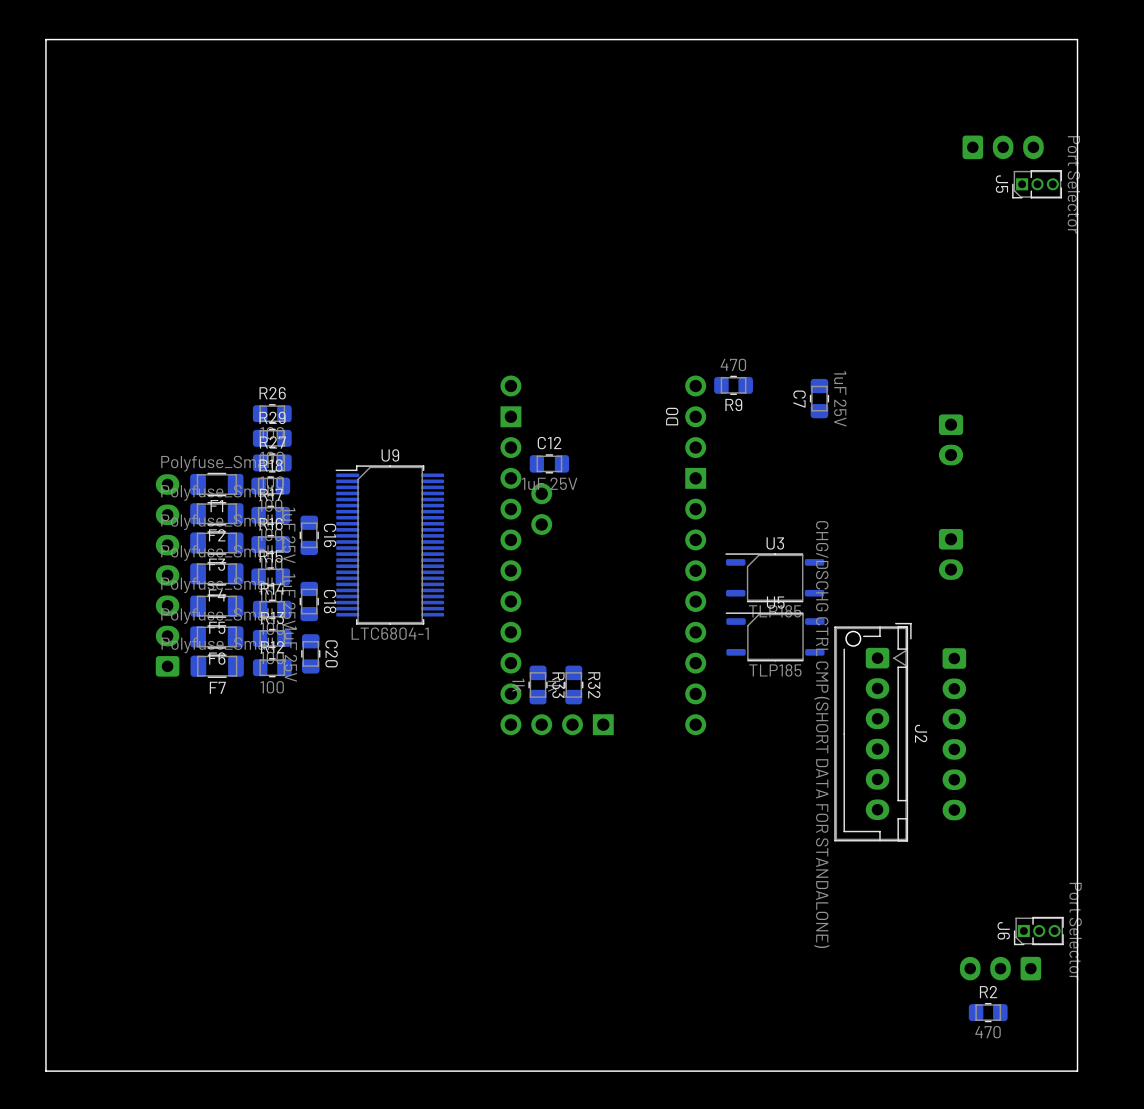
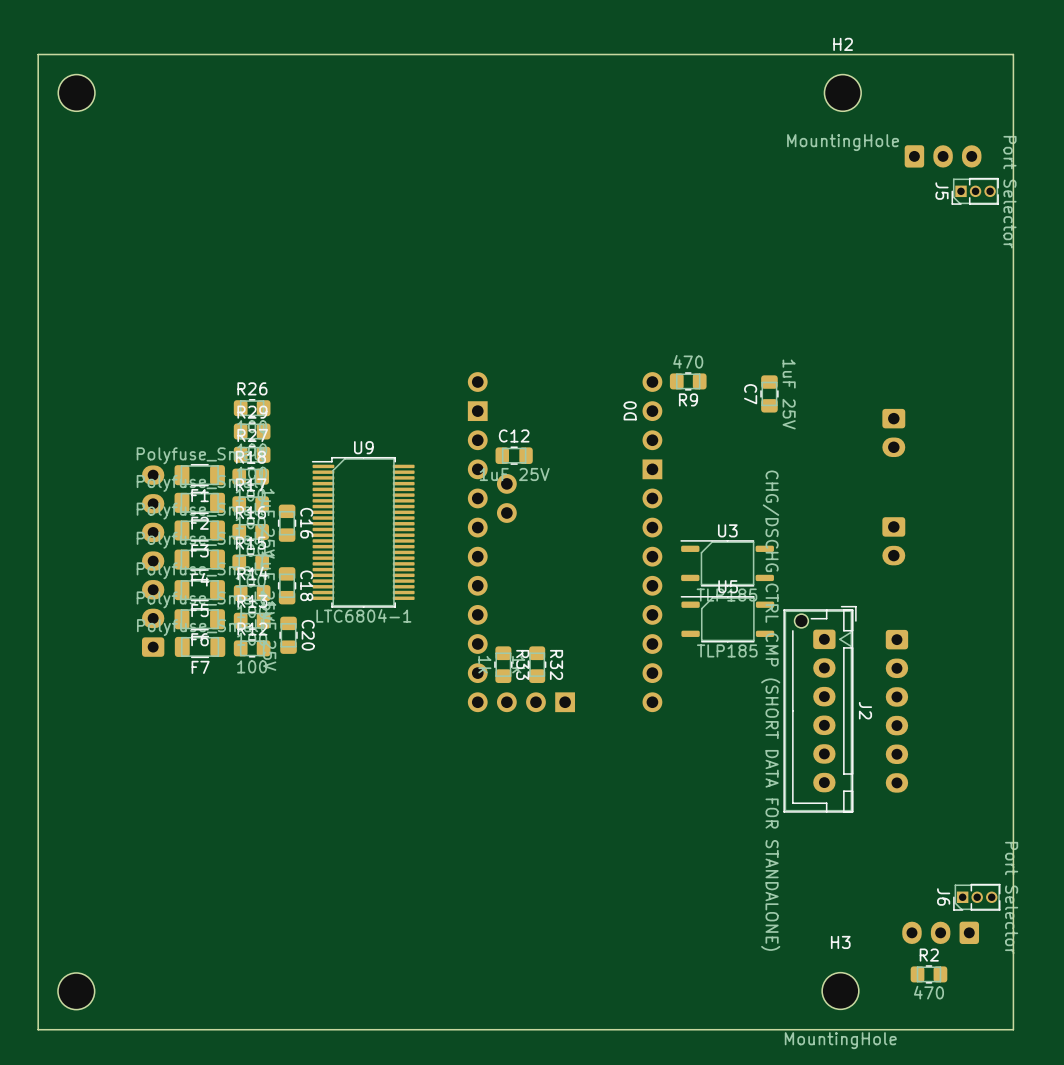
part: none -> (76, 92)
H2: none -> MountingHole (842, 92)
part: none -> (76, 991)
H3: none -> MountingHole (840, 991)

